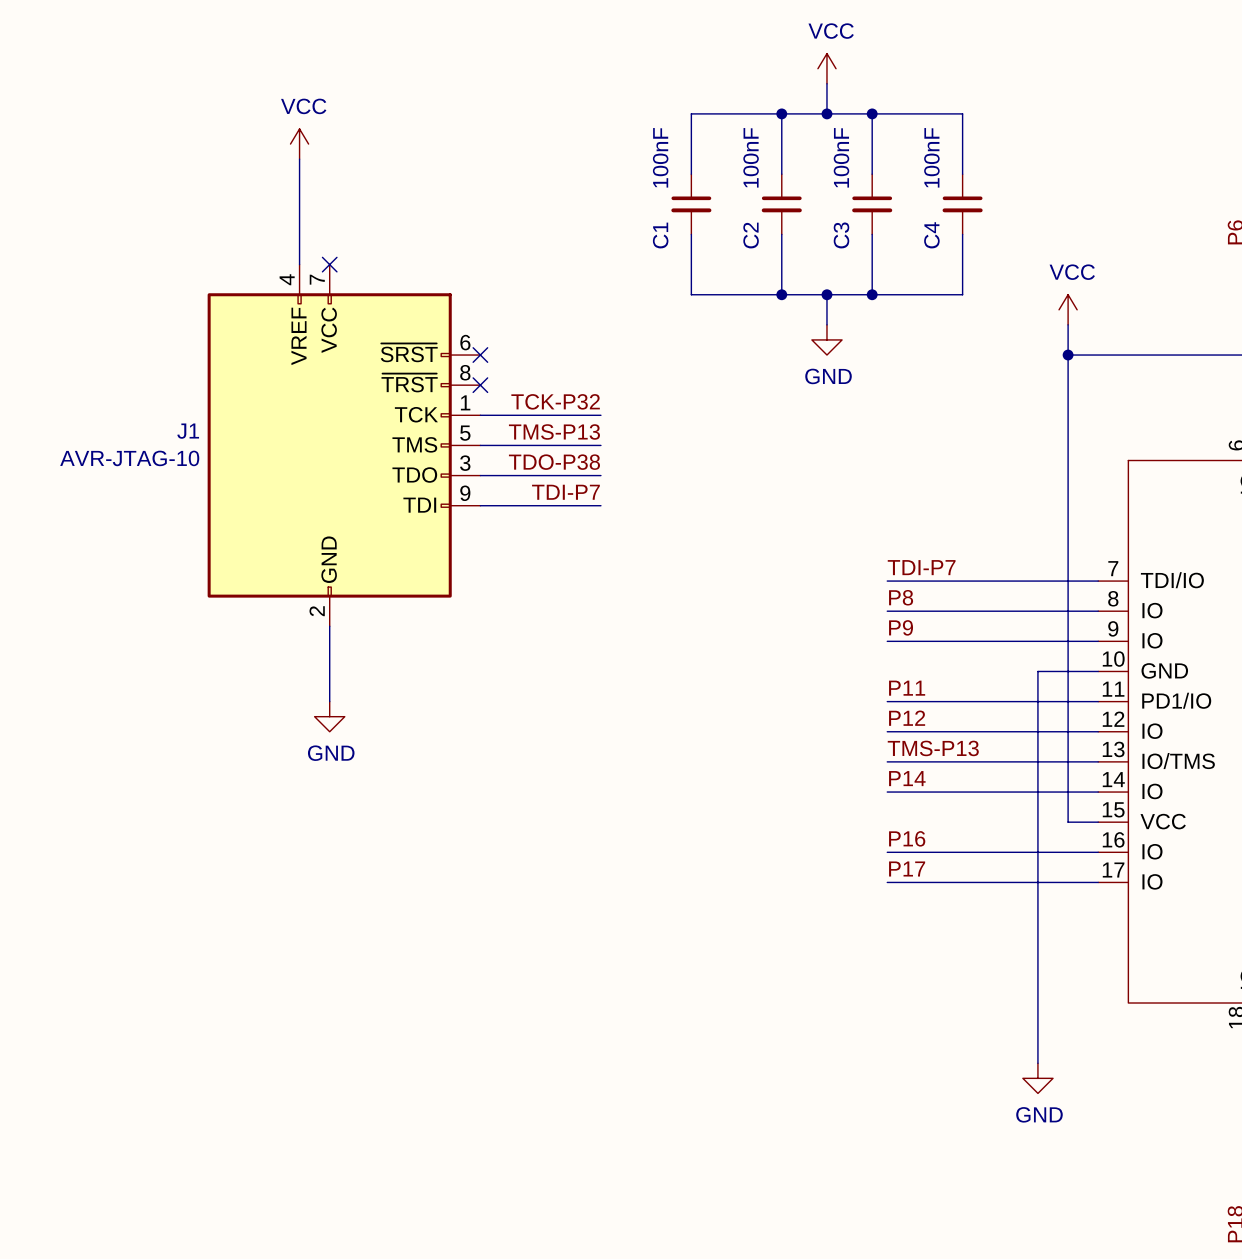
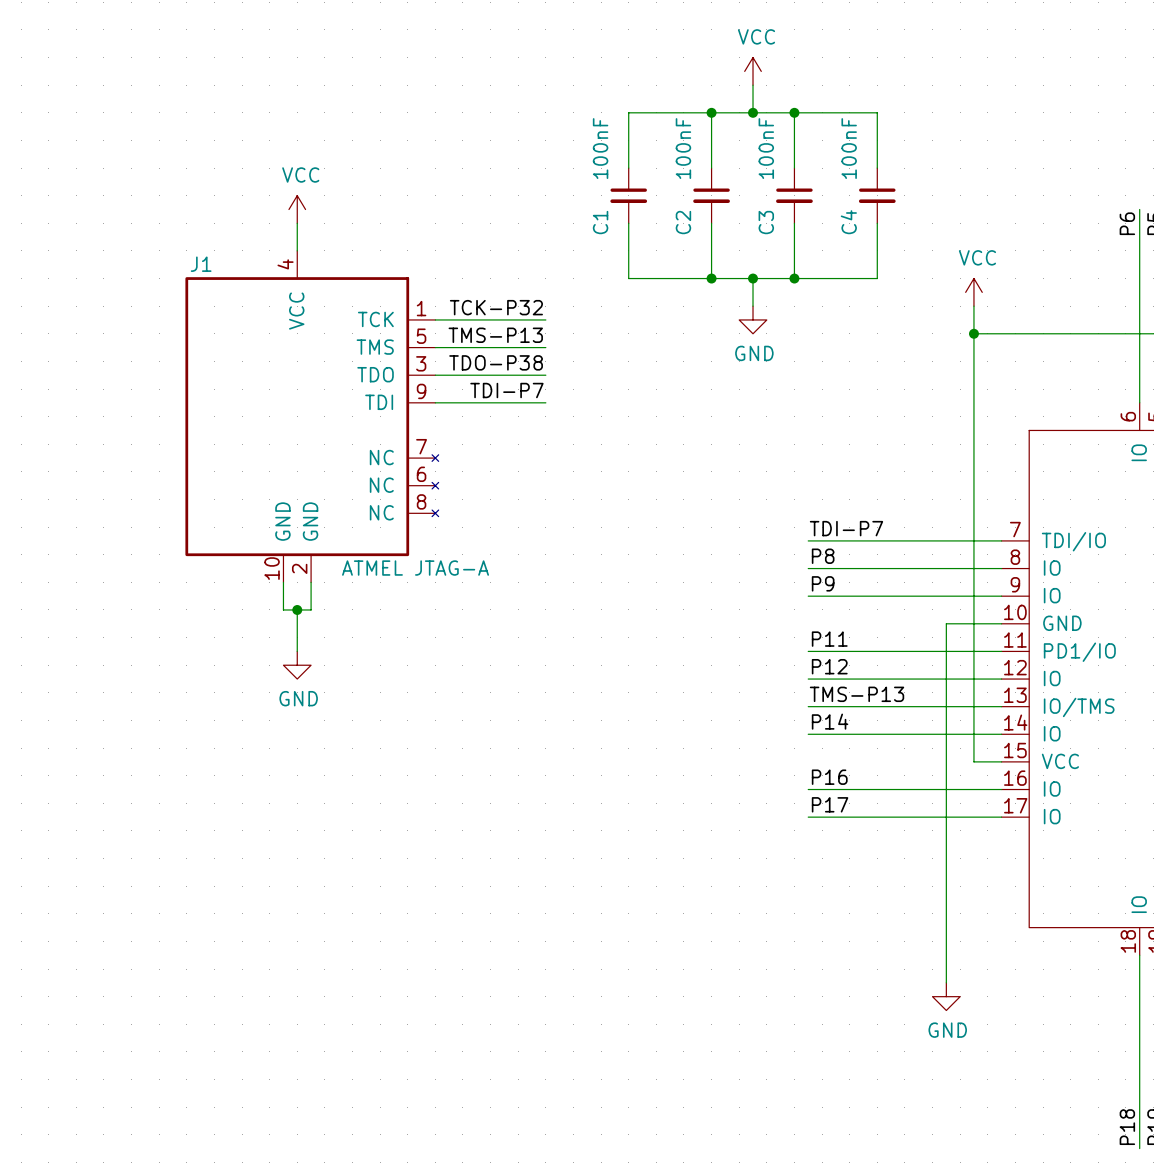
power symbol position: VCC (299, 144) -> VCC (297, 209)
wire: (299, 159) (299, 264) -> none
wire: none -> (297, 223) (297, 250)
J1 symbol: [207, 264, 481, 627] -> [185, 250, 439, 583]
no-connect mark: (329, 264) -> none
no-connect mark: (480, 355) -> none
no-connect mark: (480, 385) -> none
label position: TCK-P32 (555, 401) -> TCK-P32 (496, 307)
wire: (480, 415) (600, 415) -> (435, 319) (545, 319)
J1 name position: J1 (188, 431) -> J1 (201, 264)
label position: TMS-P13 (554, 431) -> TMS-P13 (495, 335)
wire: (480, 445) (600, 445) -> (435, 347) (545, 347)
J1 value: AVR-JTAG-10 (129, 458) -> ATMEL JTAG-A (415, 568)
label position: TDO-P38 (554, 462) -> TDO-P38 (496, 362)
wire: (480, 475) (600, 475) -> (435, 375) (545, 375)
label position: TDI-P7 (565, 492) -> TDI-P7 (506, 390)
wire: (480, 505) (600, 505) -> (435, 402) (545, 402)
wire: none -> (283, 582) (283, 609) (311, 609) (311, 582)
wire: (329, 626) (329, 656) -> none
junction: none -> (297, 609)

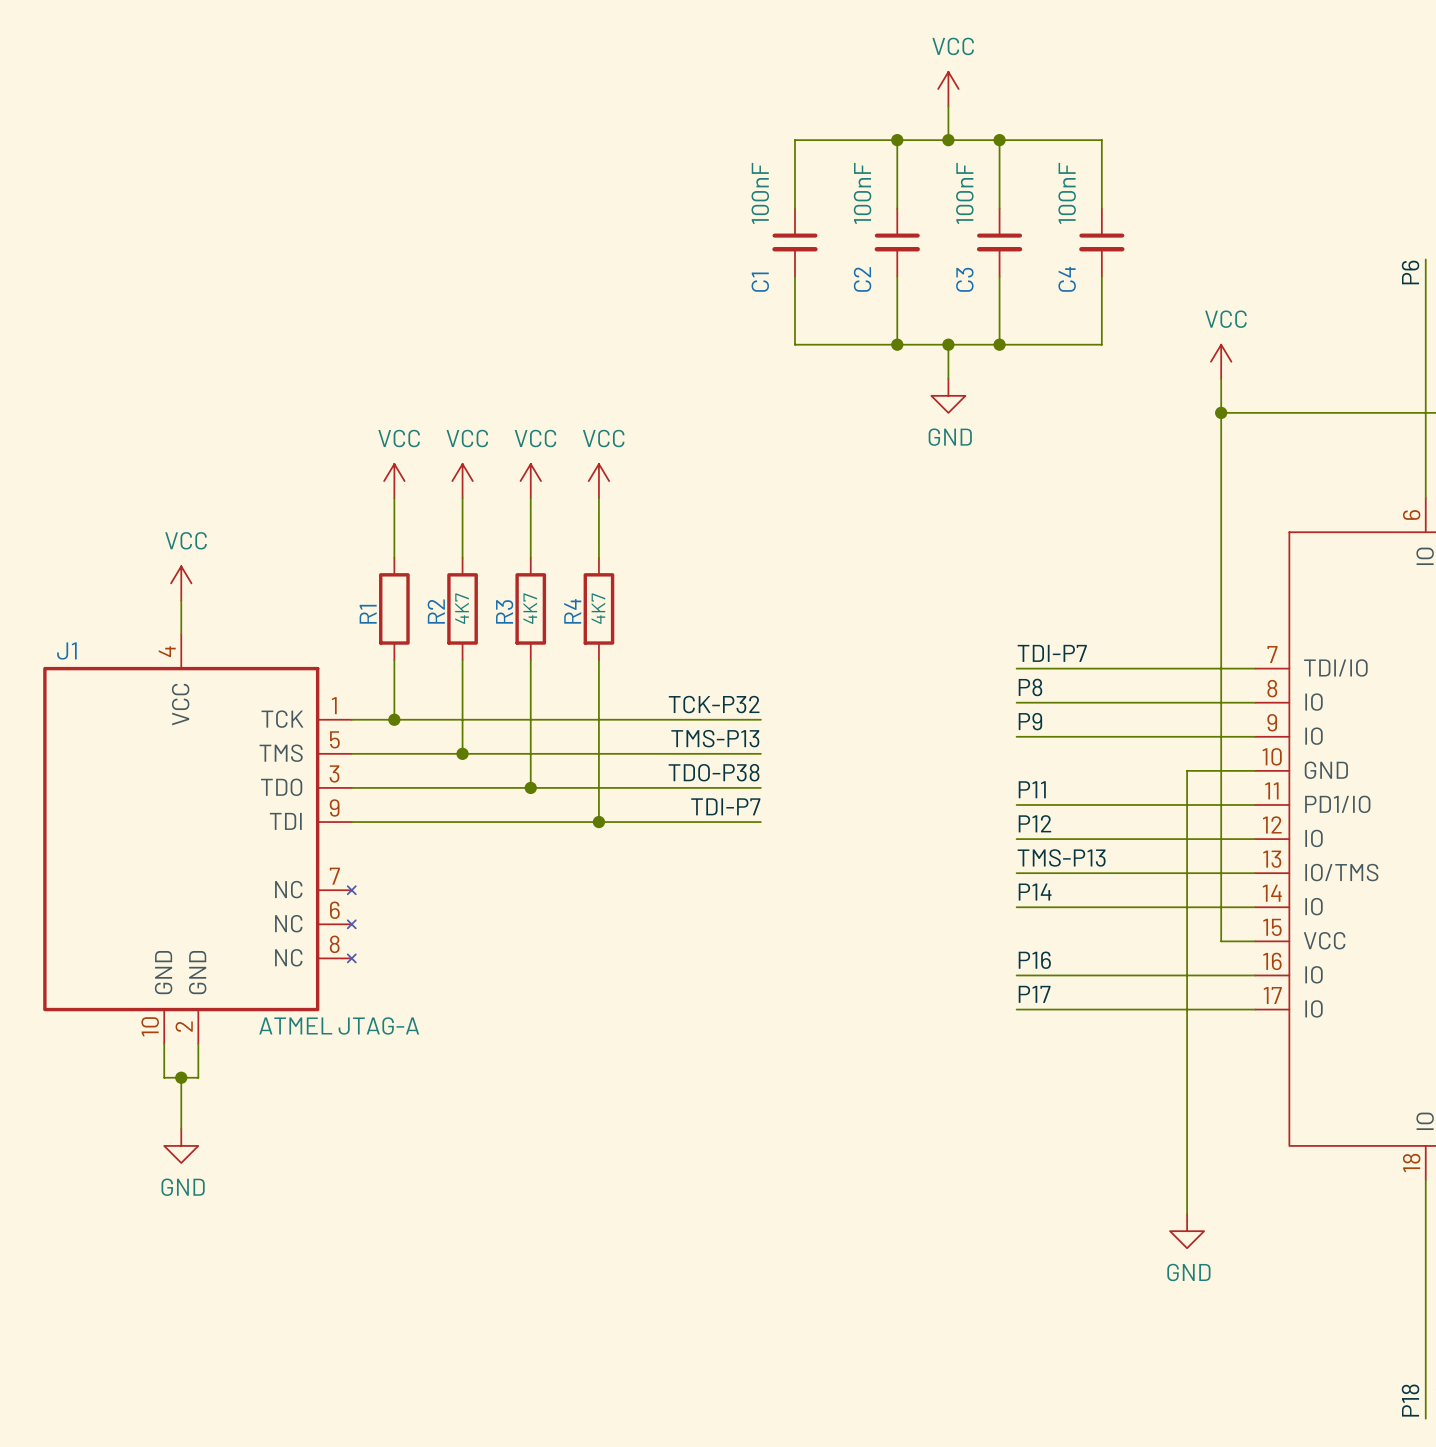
power symbol: VCC (297, 209) -> none
wire: (297, 223) (297, 250) -> none
label position: TCK-P32 (496, 307) -> TCK-P32 (714, 704)
wire: (435, 319) (545, 319) -> none
label position: TMS-P13 (495, 335) -> TMS-P13 (715, 738)
wire: (435, 347) (545, 347) -> none
label position: TDO-P38 (496, 362) -> TDO-P38 (714, 772)
wire: (435, 375) (545, 375) -> none
power symbol: none -> VCC (394, 481)
power symbol: none -> VCC (462, 481)
power symbol: none -> VCC (530, 481)
power symbol: none -> VCC (598, 481)
label position: TDI-P7 (506, 390) -> TDI-P7 (725, 806)
wire: none -> (394, 498) (394, 557)
wire: none -> (462, 498) (462, 557)
wire: none -> (530, 498) (530, 557)
wire: (435, 402) (545, 402) -> none
wire: none -> (598, 498) (598, 557)
J1 position: (312, 416) -> (199, 839)
power symbol: none -> VCC (181, 583)
wire: none -> (181, 600) (181, 634)
R1: none -> (394, 608)
R2: none -> 4K7 (462, 608)
R3: none -> 4K7 (530, 608)
R4: none -> 4K7 (598, 608)
wire: none -> (394, 660) (394, 719)
wire: none -> (462, 660) (462, 753)
wire: none -> (530, 660) (530, 787)
wire: none -> (598, 660) (598, 822)
wire: none -> (351, 719) (760, 719)
wire: (283, 582) (283, 609) -> (351, 753) (368, 753)
wire: (311, 582) (311, 609) -> (760, 753) (402, 753)
wire: (297, 609) (297, 651) -> none
junction position: (297, 609) -> (394, 719)
junction: none -> (462, 753)
wire: none -> (351, 787) (760, 787)
junction: none -> (530, 787)
wire: none -> (351, 822) (760, 822)
power symbol: GND (297, 665) -> none
junction: none -> (598, 822)
wire: none -> (164, 1043) (164, 1077) (198, 1077) (198, 1043)
wire: none -> (181, 1077) (181, 1128)
junction: none -> (181, 1077)
power symbol: none -> GND (181, 1145)

